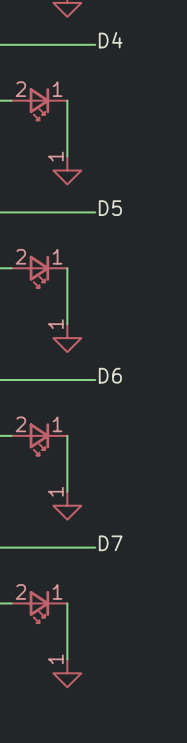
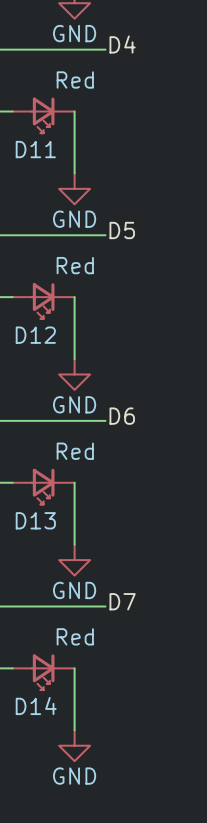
power symbol text: none -> GND (74, 33)
D11 value: none -> Red (75, 79)
D11 pin number: 2 (20, 89) -> none
D11 pin number: 1 (57, 89) -> none
D11 name: none -> D11 (35, 149)
power symbol pin number: 1 (55, 156) -> none
power symbol text: none -> GND (74, 219)
D12 value: none -> Red (75, 265)
D12 pin number: 2 (20, 256) -> none
D12 pin number: 1 (57, 256) -> none
D12 name: none -> D12 (35, 335)
power symbol pin number: 1 (55, 324) -> none
power symbol text: none -> GND (74, 404)
D13 value: none -> Red (75, 451)
D13 pin number: 2 (20, 424) -> none
D13 pin number: 1 (57, 424) -> none
D13 name: none -> D13 (35, 520)
power symbol pin number: 1 (55, 491) -> none
power symbol text: none -> GND (74, 590)
D14 value: none -> Red (75, 636)
D14 pin number: 2 (20, 591) -> none
D14 pin number: 1 (57, 591) -> none
D14 name: none -> D14 (36, 706)
power symbol pin number: 1 (55, 659) -> none
power symbol text: none -> GND (74, 776)

